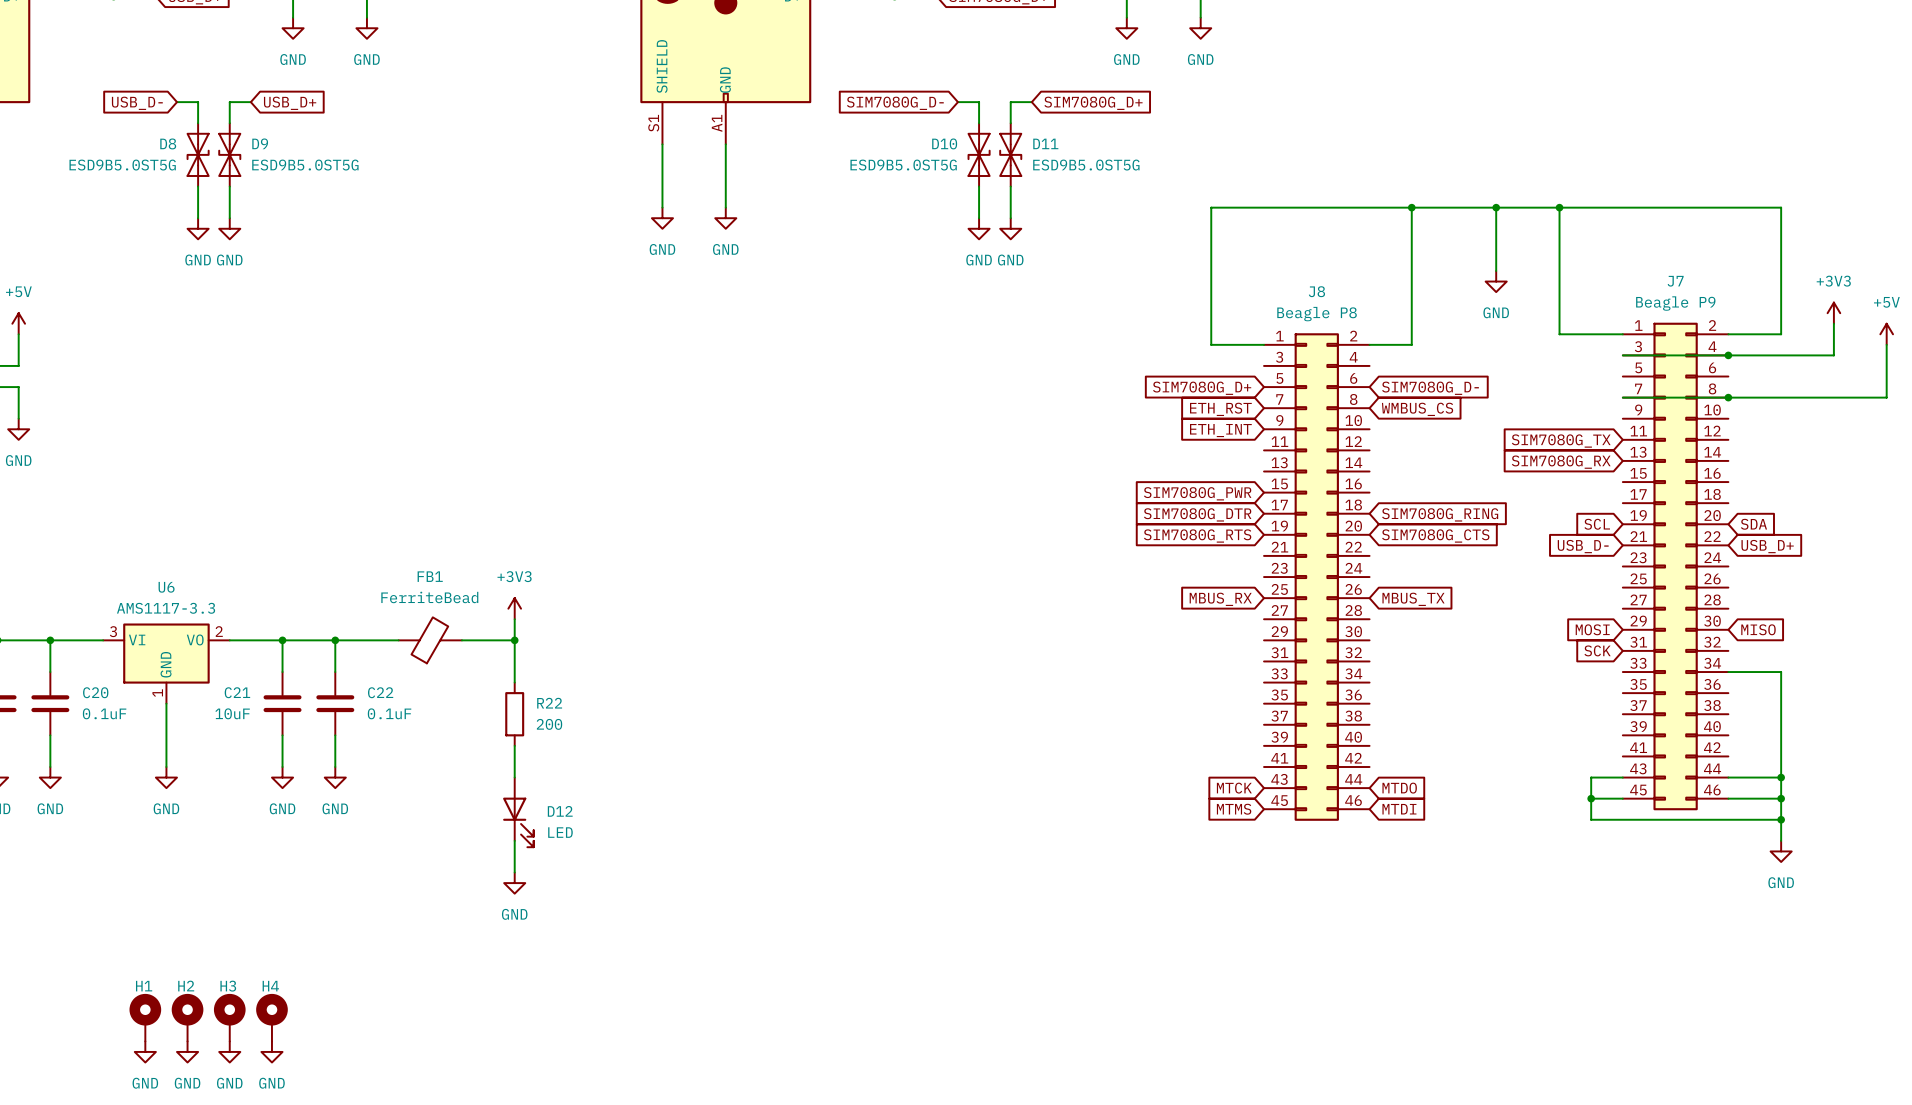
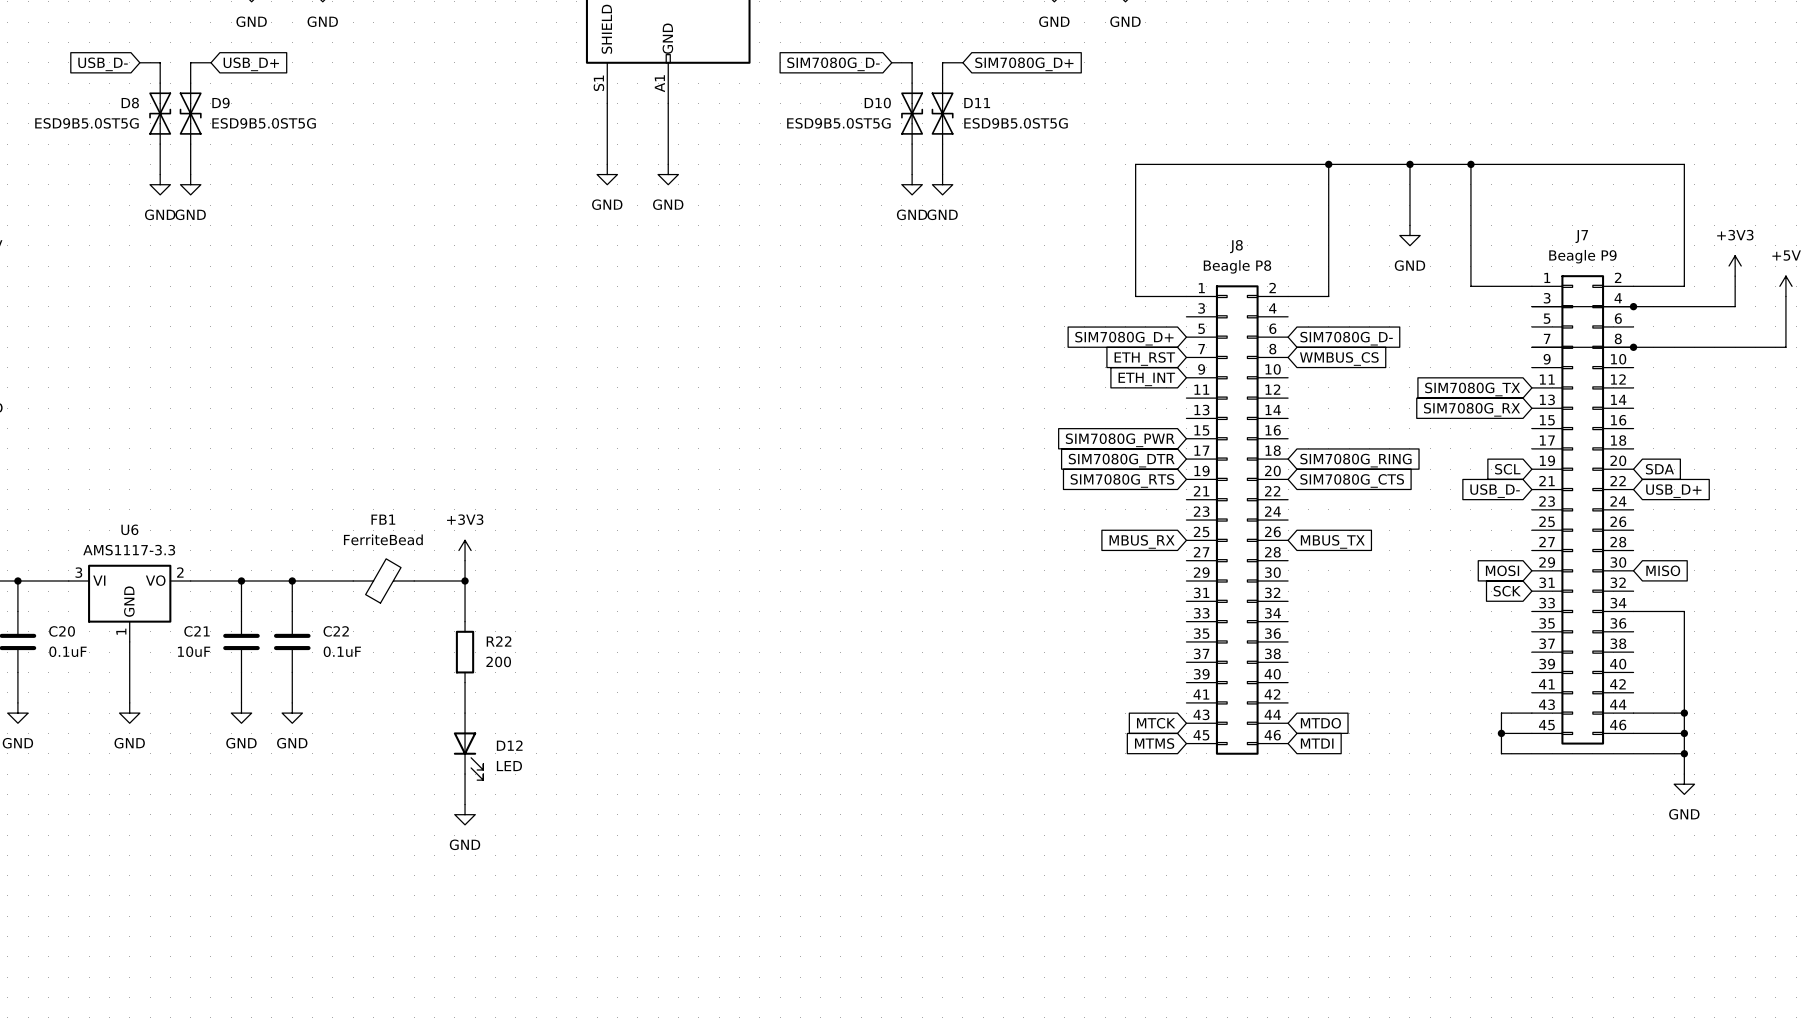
H1: (145, 1017) -> none
H2: (187, 1017) -> none
H3: (229, 1017) -> none
H4: (271, 1017) -> none
power symbol: GND (145, 1051) -> none
power symbol: GND (187, 1051) -> none
power symbol: GND (229, 1051) -> none
power symbol: GND (271, 1051) -> none

